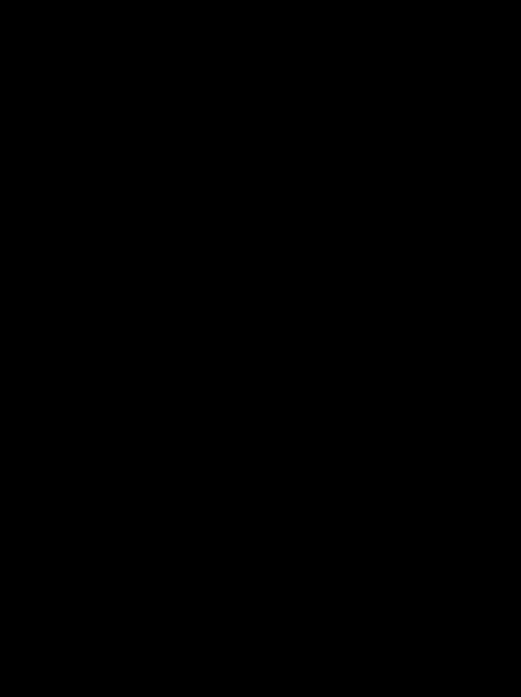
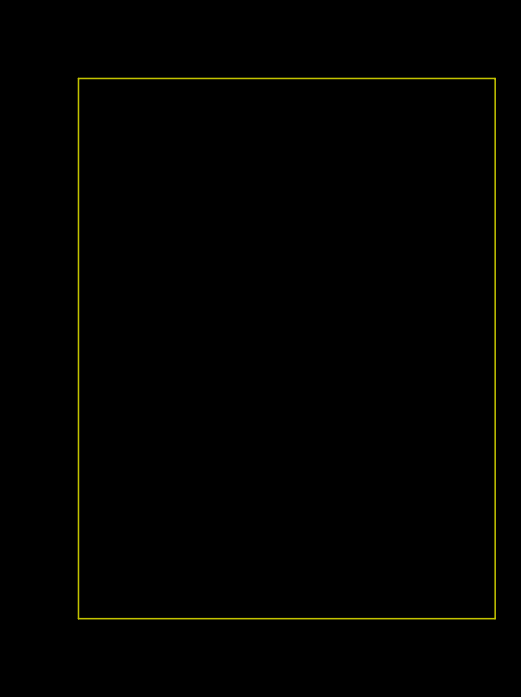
board edge: none -> (495, 78) (78, 78) (78, 618) (495, 618) (495, 78)

